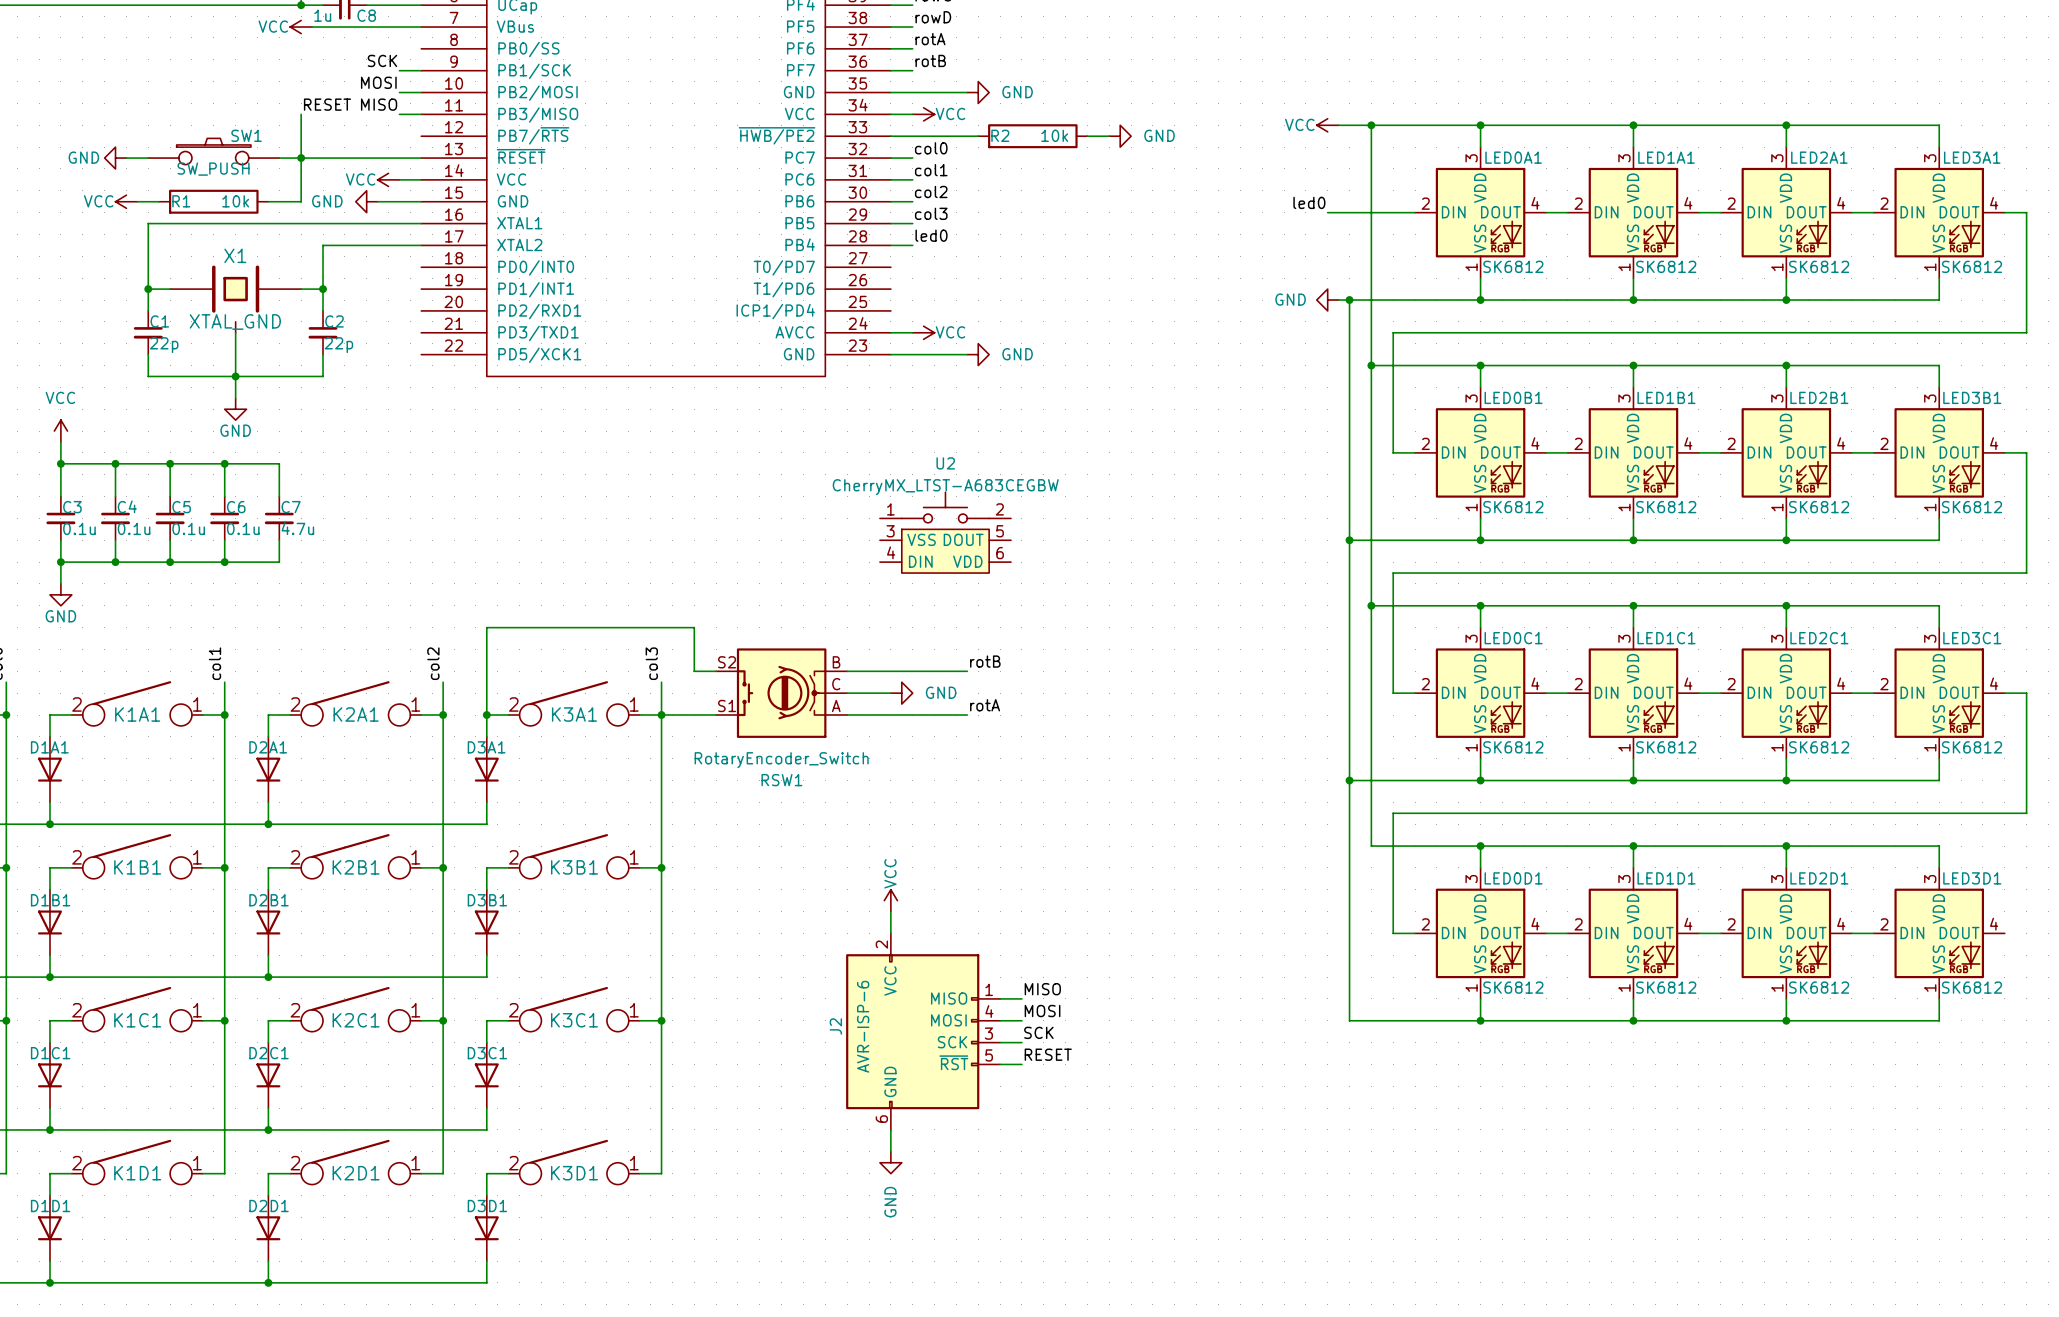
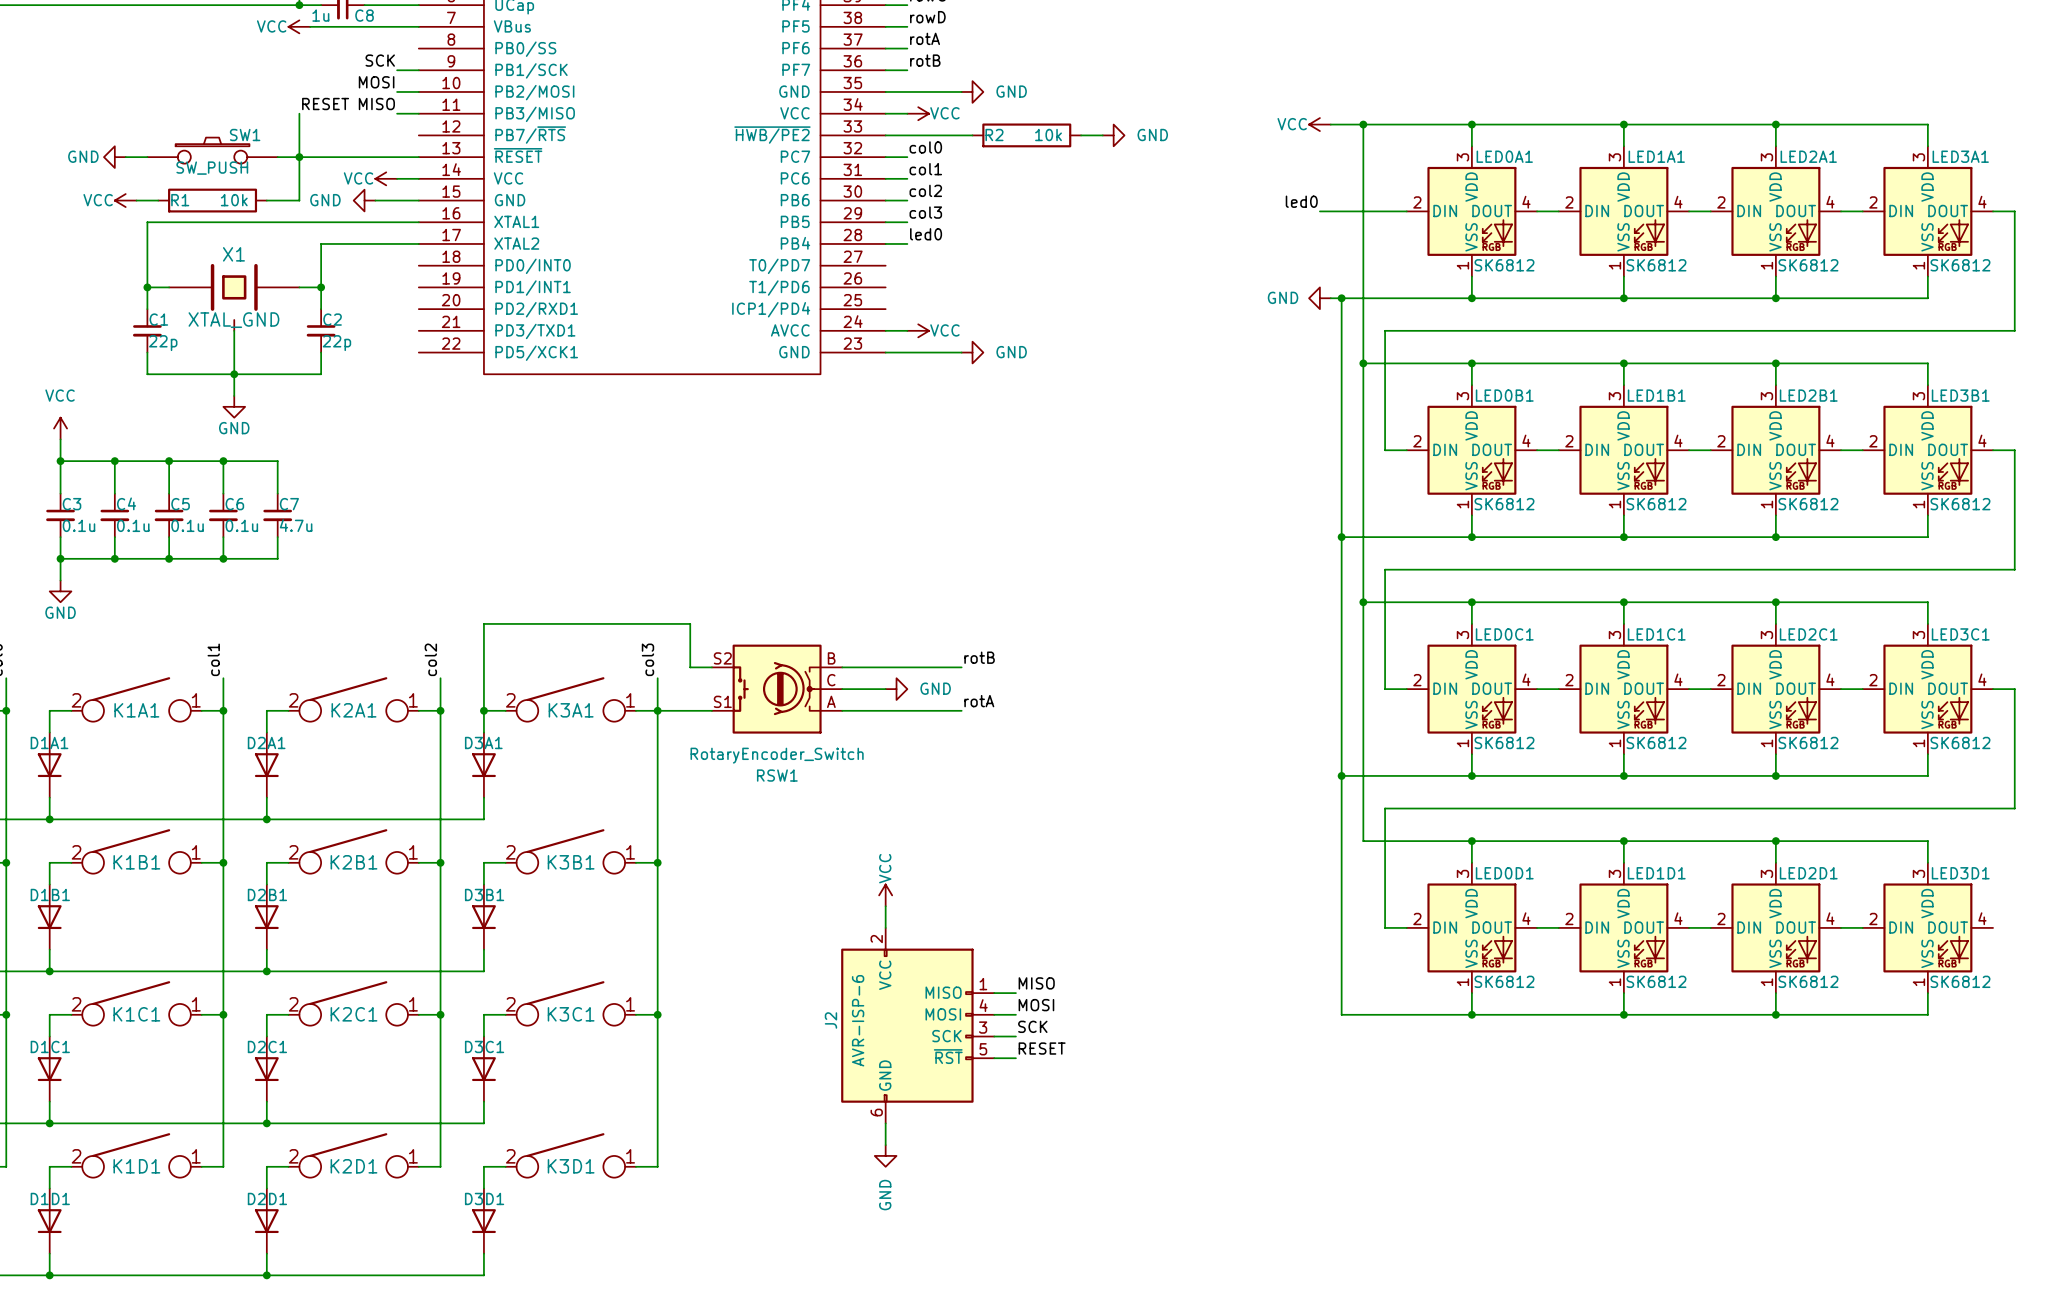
U2: CherryMX_LTST-A683CEGBW (945, 532) -> none

